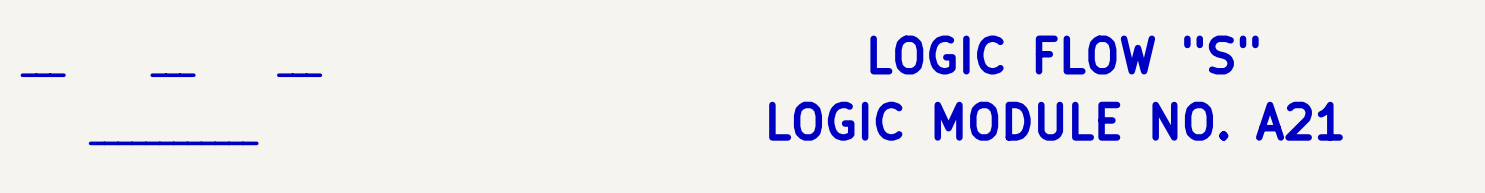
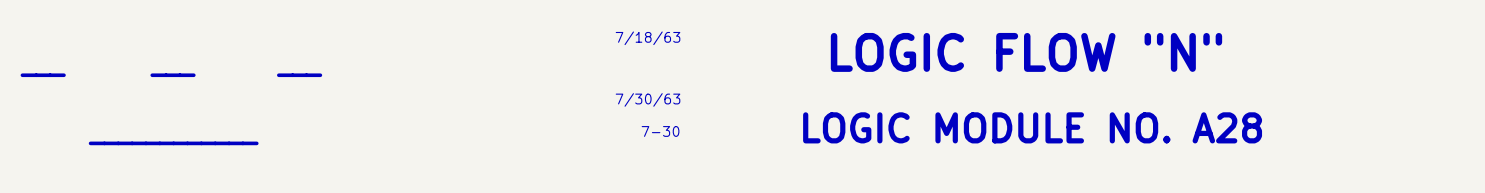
text: none -> 7/18/63 (648, 38)
text: LOGIC FLOW "S" (1064, 55) -> LOGIC FLOW "N" (1026, 52)
text: none -> 7/30/63 (648, 99)
text: LOGIC MODULE NO. A21 (1056, 121) -> LOGIC MODULE NO. A28 (1032, 127)
text: none -> 7-30 (660, 131)

